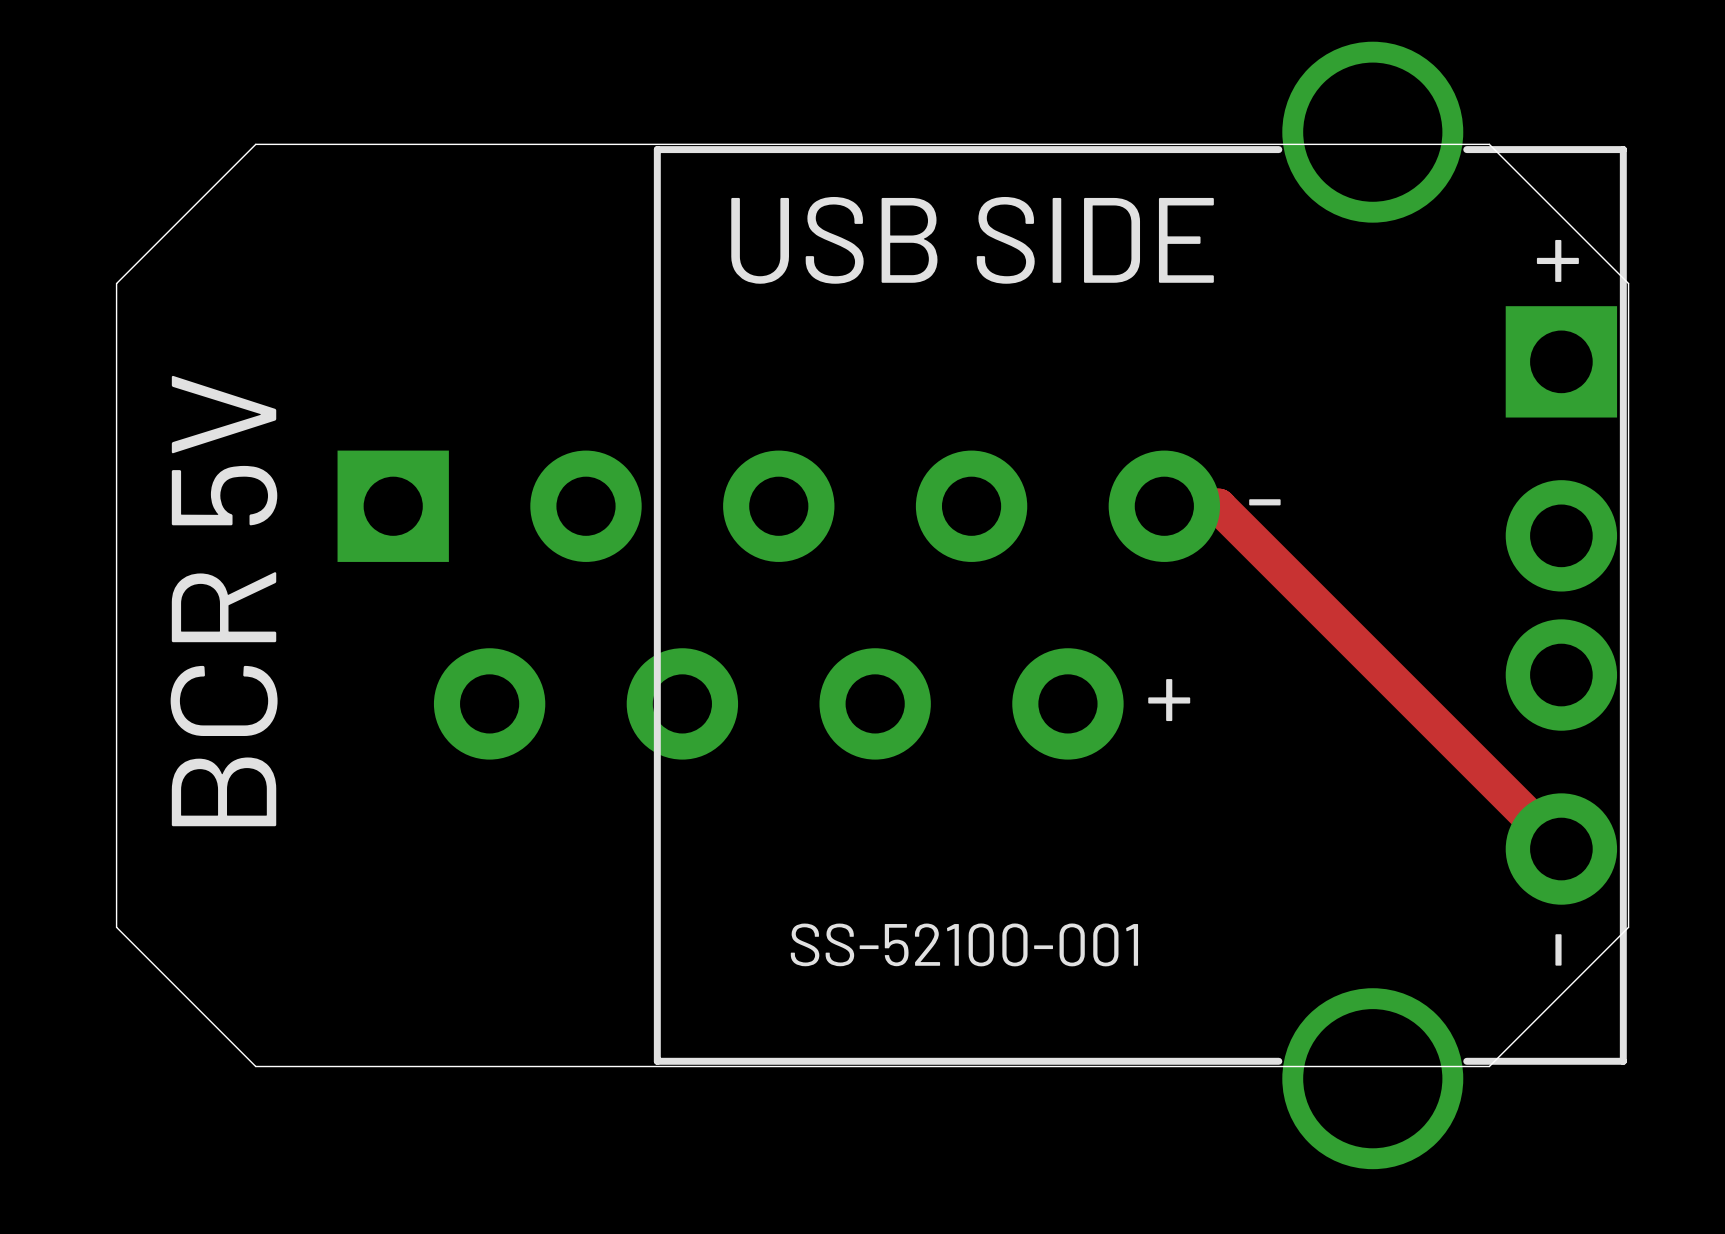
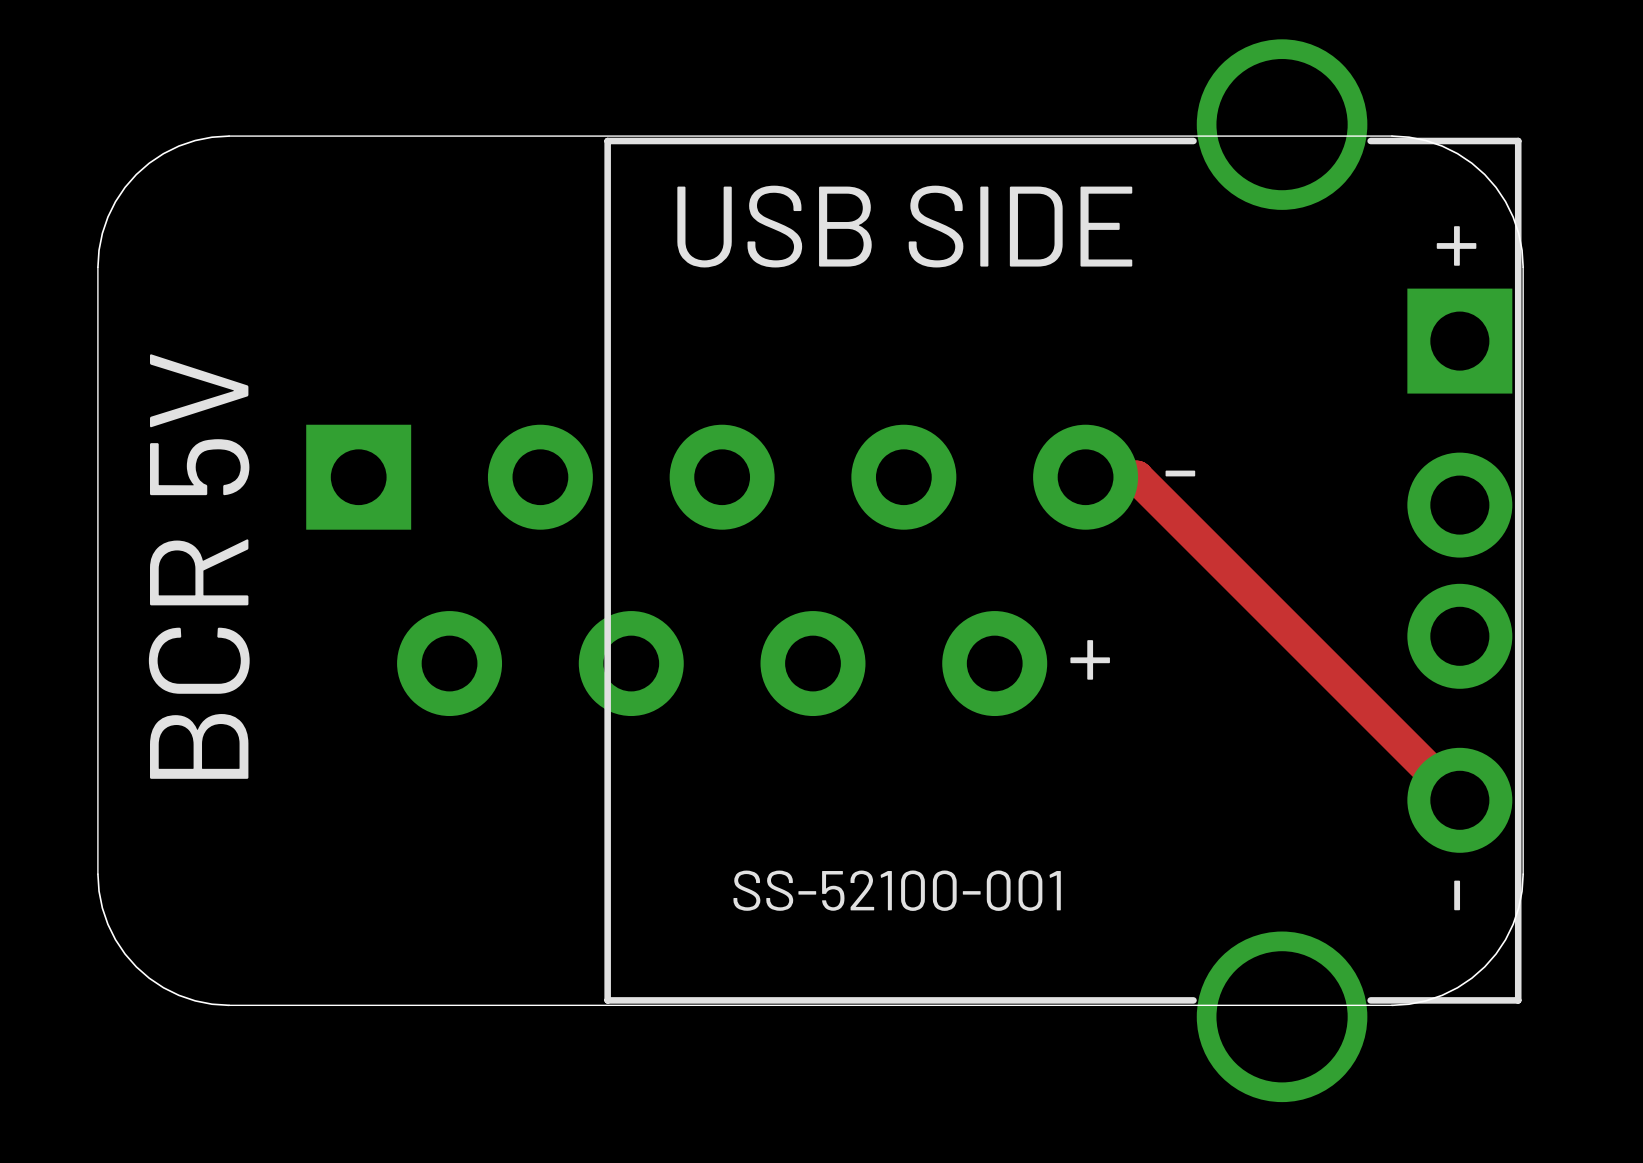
board edge: (255, 144) (116, 283) -> (229, 136) (195, 140) (178, 146) (163, 153) (136, 174) (115, 201) (107, 217) (102, 233) (97, 267)
board edge: (1489, 144) (1628, 283) -> (1391, 136) (1425, 140) (1442, 146) (1457, 153) (1484, 174) (1496, 187) (1513, 217) (1522, 250) (1523, 267)
board edge: (116, 927) (255, 1066) -> (97, 874) (102, 908) (107, 924) (115, 939) (136, 966) (163, 987) (178, 995) (195, 1000) (229, 1005)
board edge: (1628, 927) (1489, 1066) -> (1523, 874) (1522, 891) (1513, 924) (1496, 953) (1484, 966) (1457, 987) (1442, 995) (1425, 1000) (1391, 1005)

